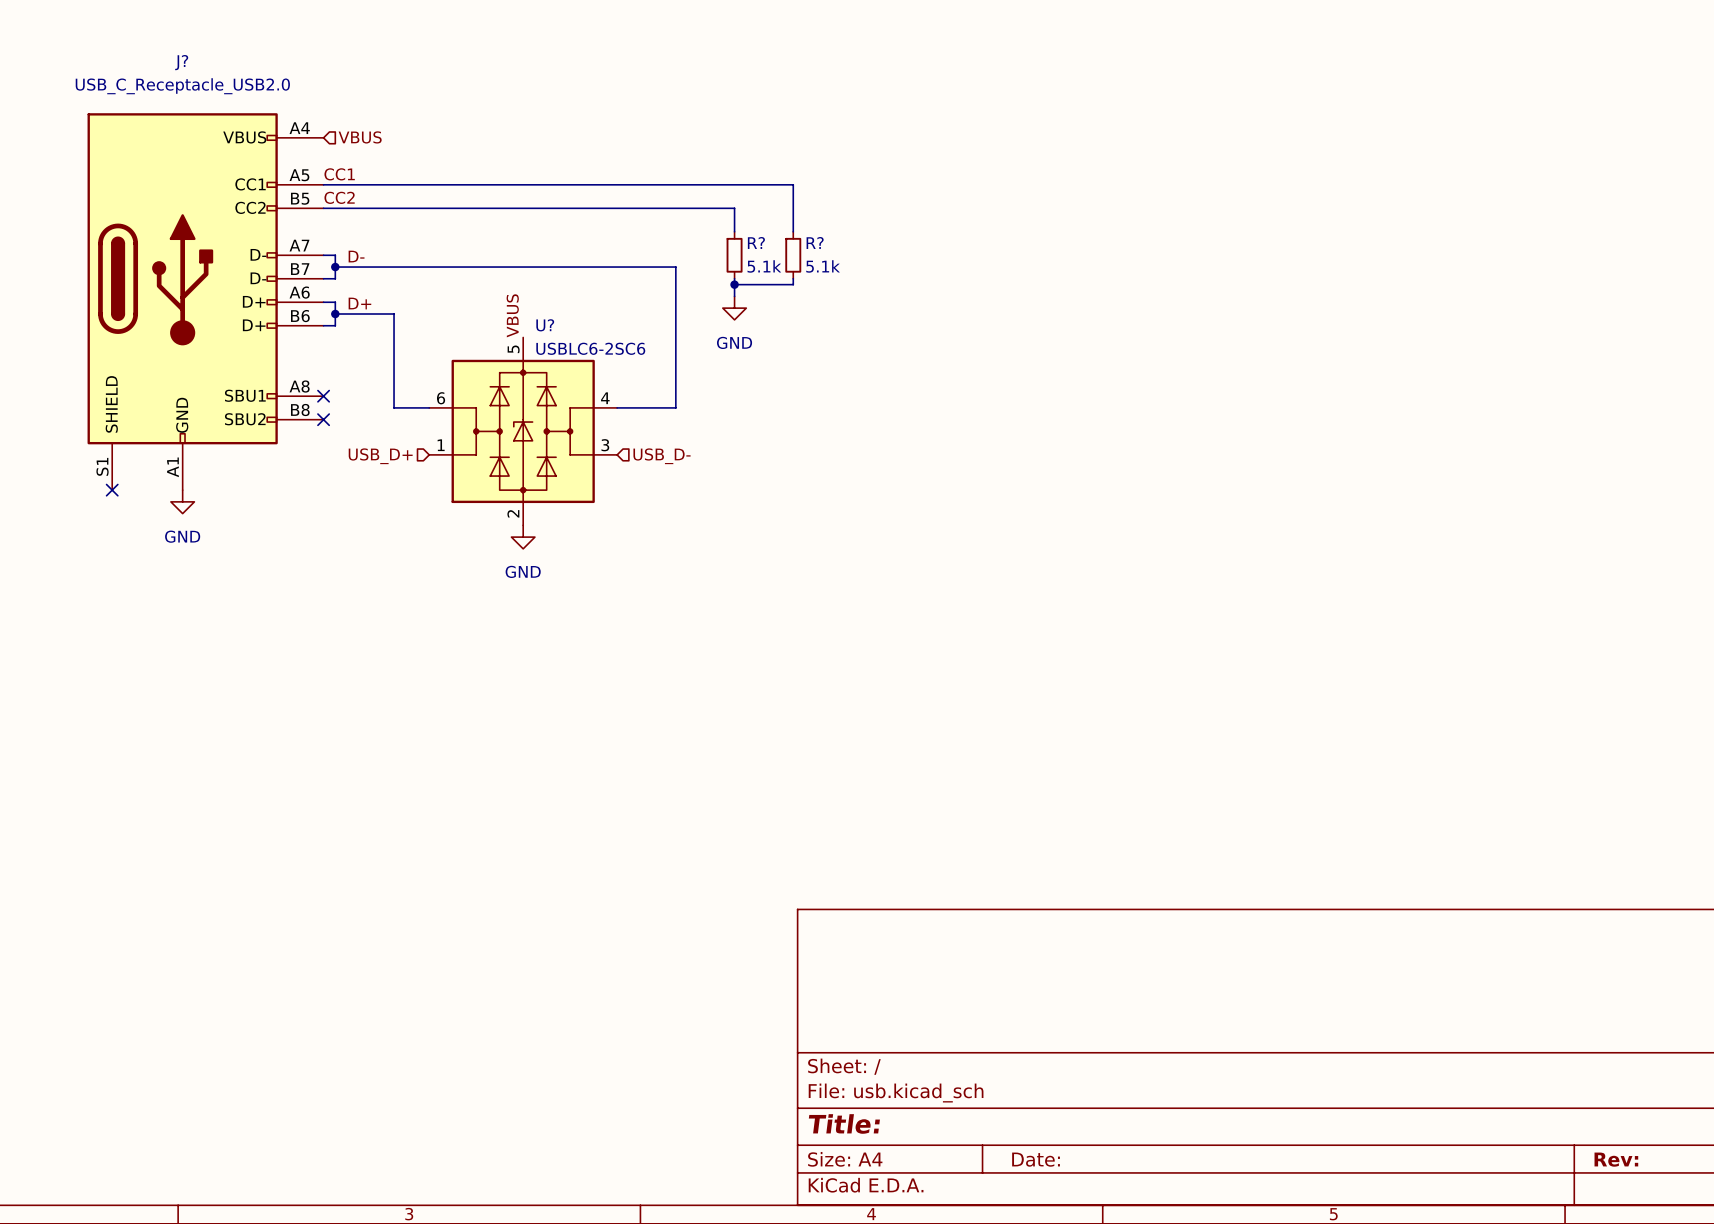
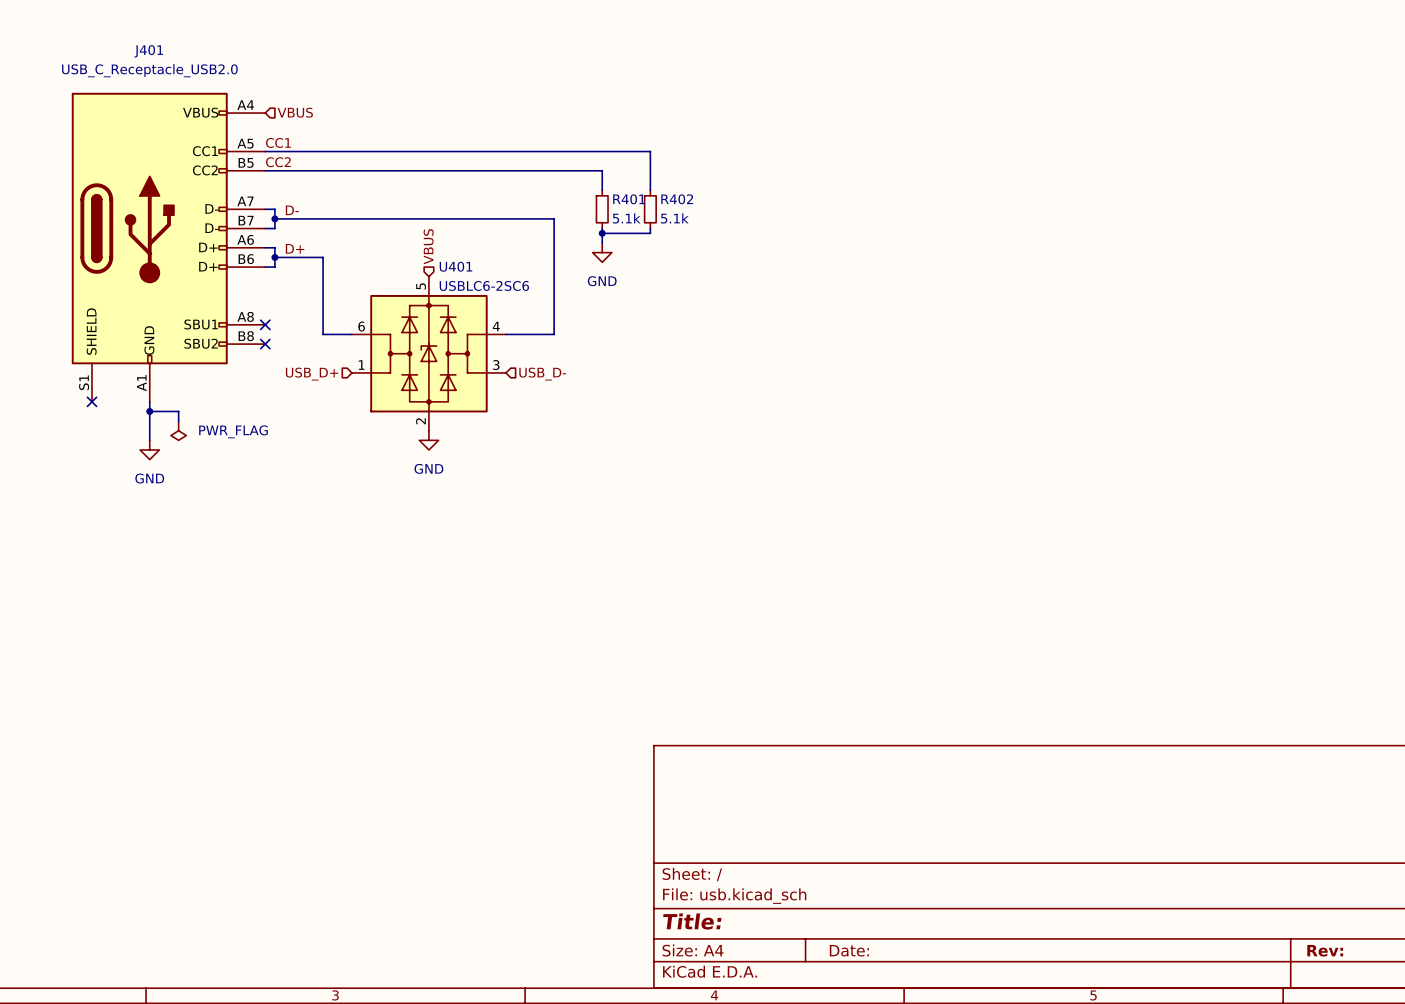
J? name: J? (181, 62) -> J401 (148, 51)
R? name: R? (756, 243) -> R401 (629, 199)
R? name: R? (815, 243) -> R402 (677, 199)
hierarchical label: none -> VBUS (428, 246)
label: VBUS (512, 315) -> none
U? name: U? (545, 325) -> U401 (455, 266)
wire: none -> (149, 401) (149, 440)
wire: none -> (149, 411) (178, 411) (178, 421)
power symbol position: GND (182, 501) -> GND (149, 449)
junction: none -> (149, 411)
power symbol: none -> PWR_FLAG (178, 430)

